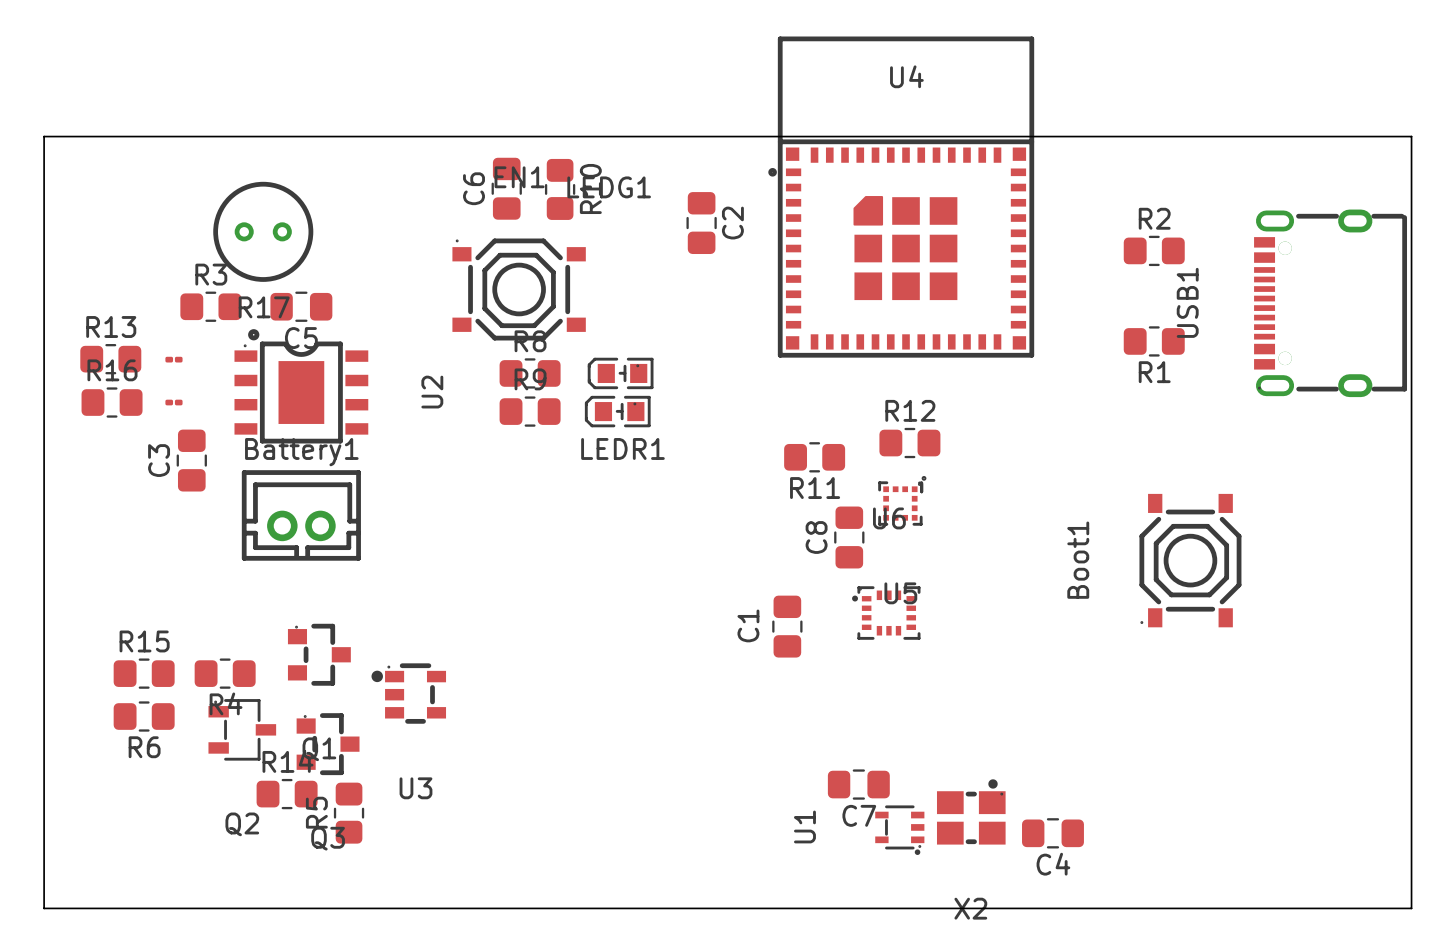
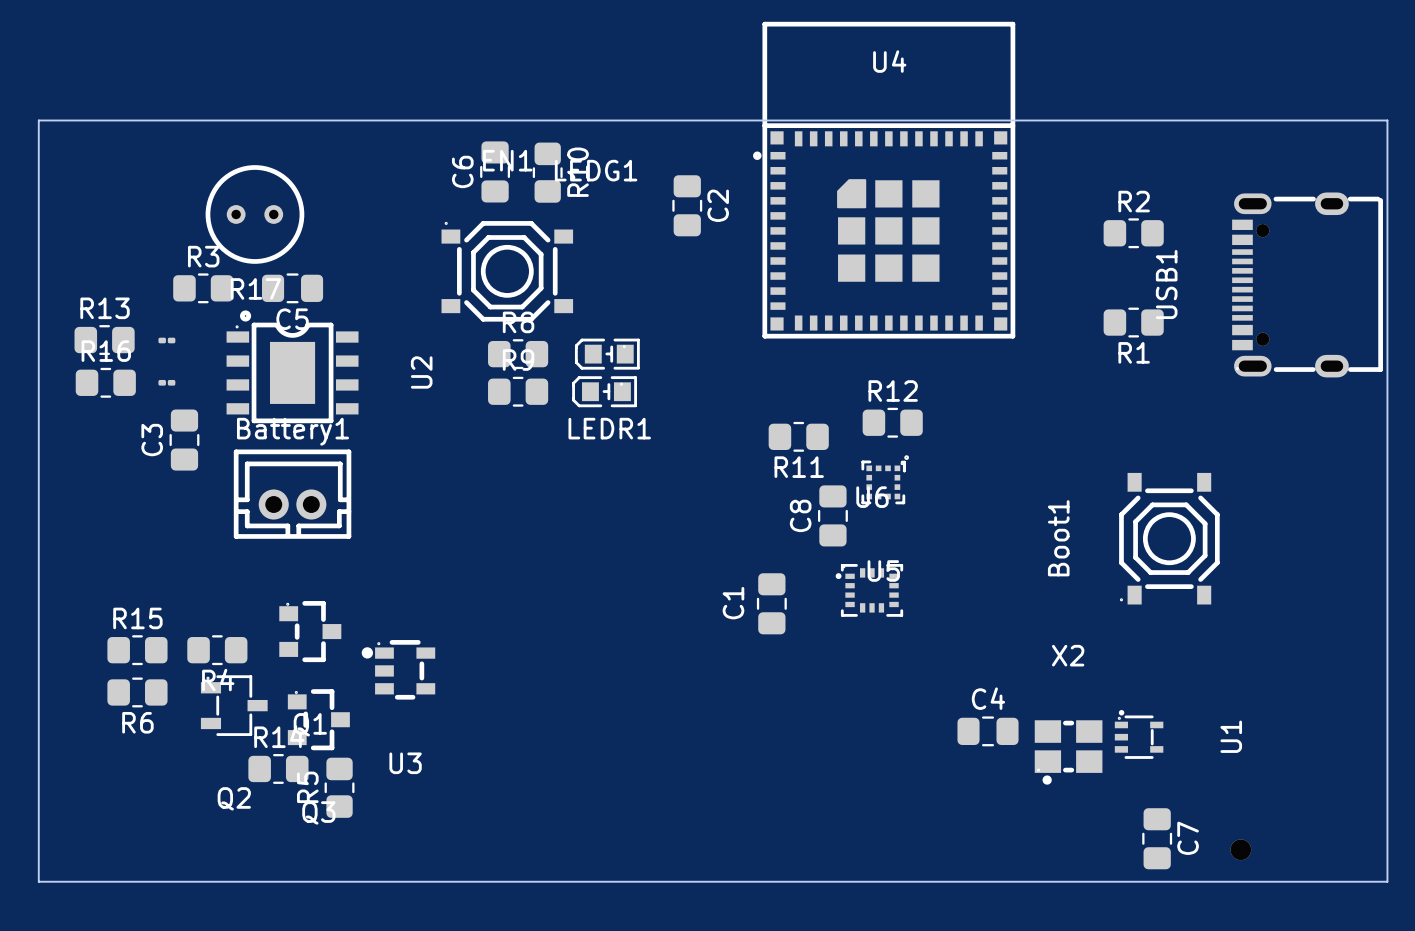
C7 rotation: 0° (858, 784) -> 90° clockwise (1157, 838)
C7 position: (858, 784) -> (1157, 838)
X2 rotation: 0° (971, 811) -> 180° (1068, 752)
X2 position: (971, 811) -> (1068, 752)
C7 name position: C7 (859, 815) -> C7 (1188, 838)
U1 rotation: 0° (899, 830) -> 180° (1139, 734)
U1 position: (899, 830) -> (1139, 734)
C4 position: (1052, 833) -> (988, 731)
C4 name position: C4 (1053, 864) -> C4 (988, 698)
part: none -> (1240, 849)

